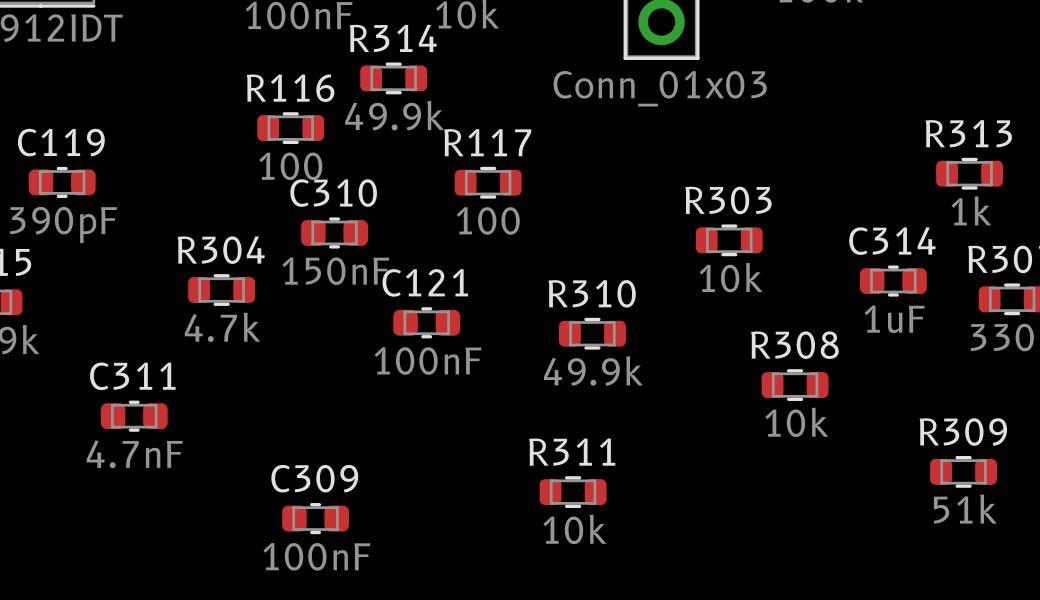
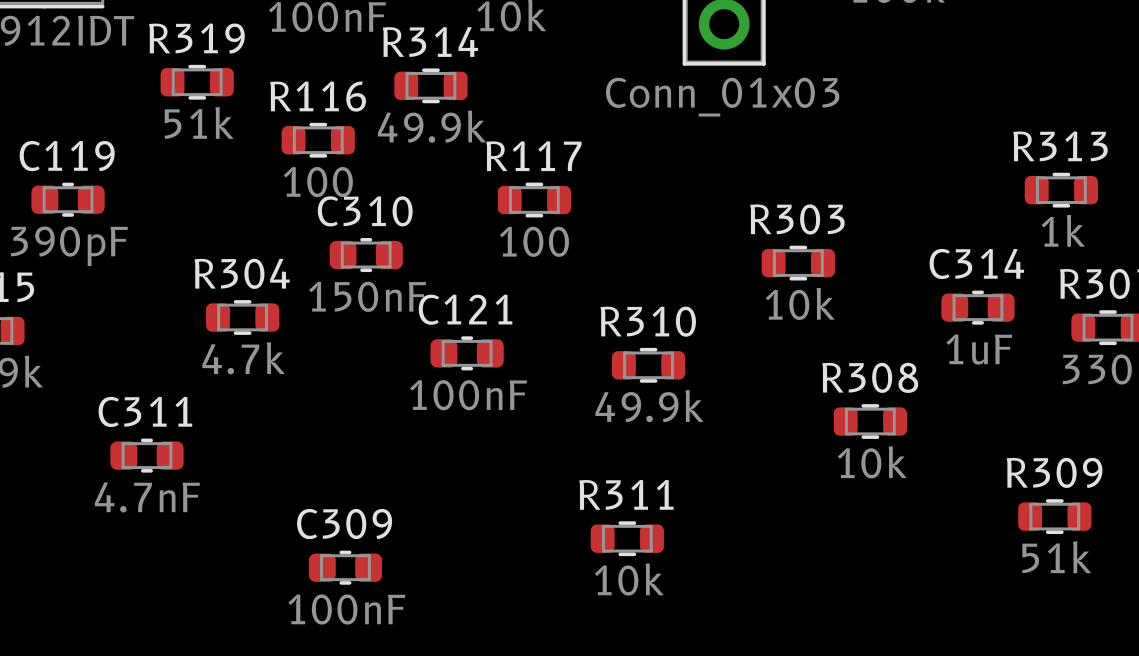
R319: none -> 51k (197, 82)

